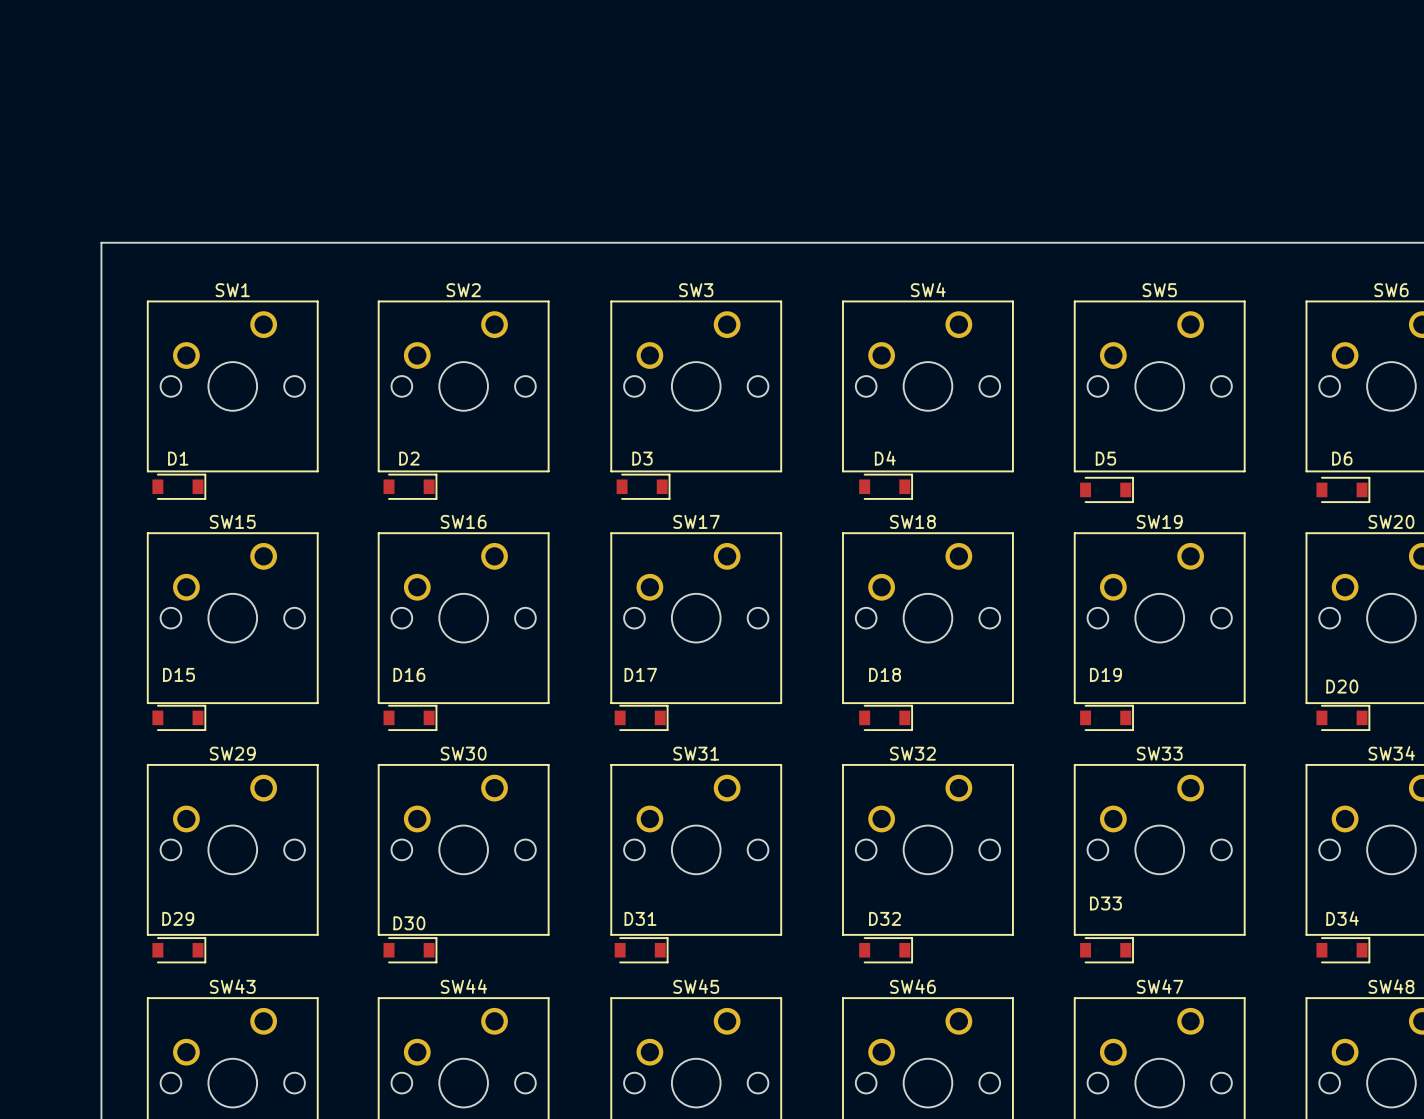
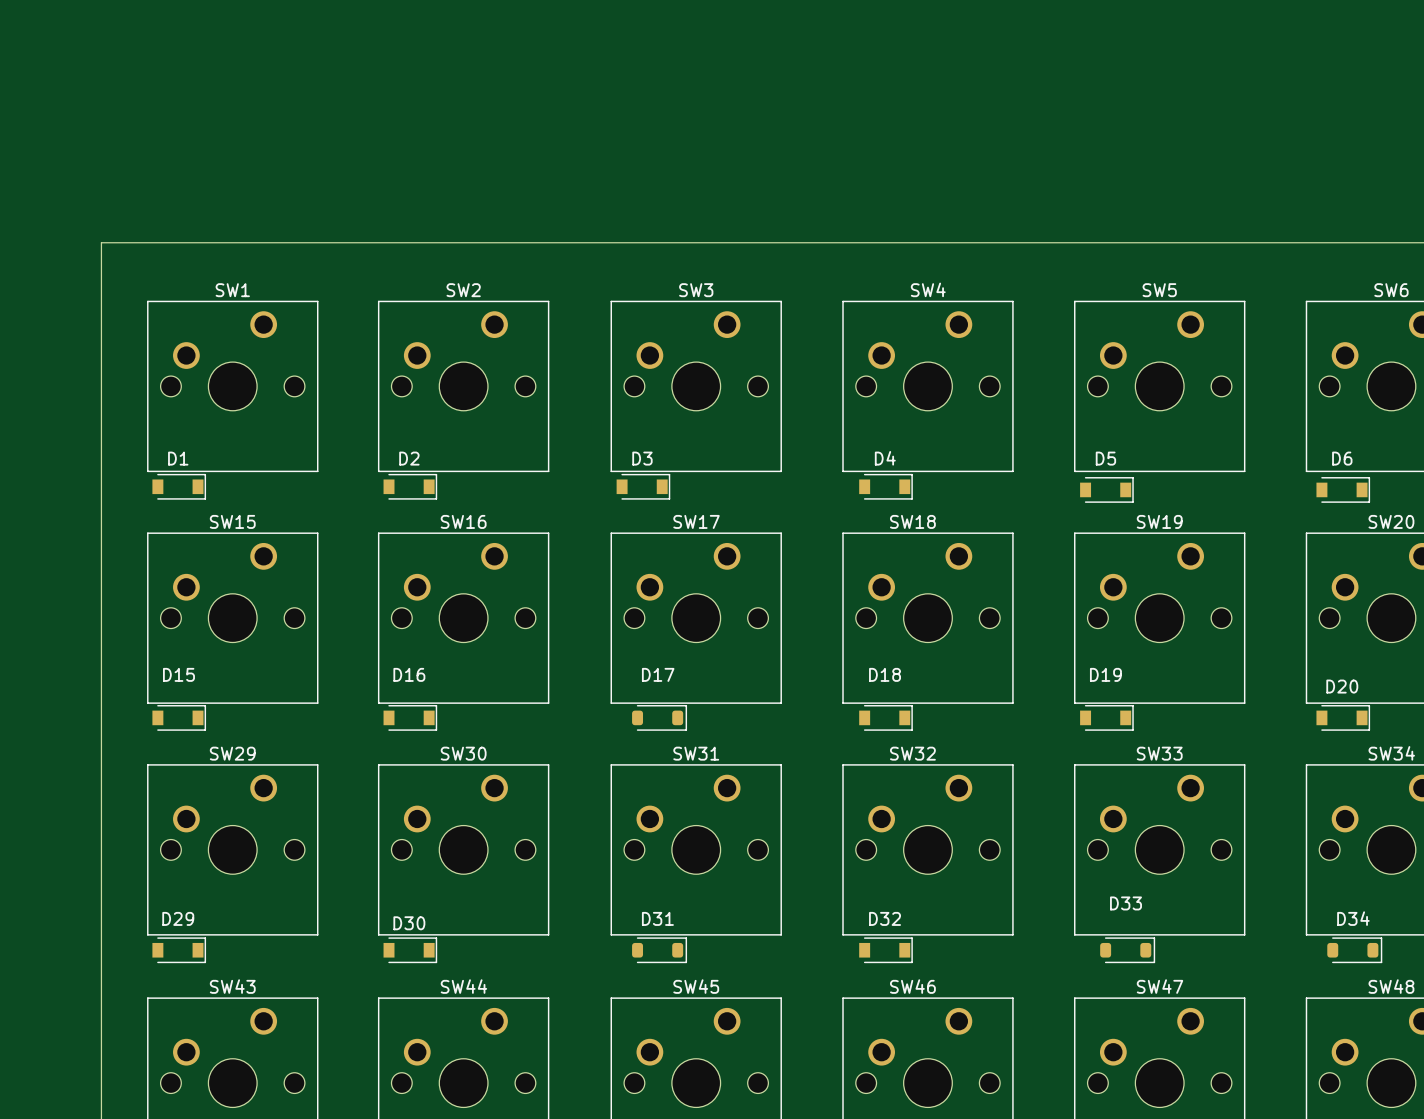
D17 footprint: [614, 705, 669, 731] -> [632, 705, 688, 731]
D31 footprint: [614, 937, 669, 964] -> [632, 937, 688, 964]
D33 footprint: [1080, 937, 1134, 964] -> [1100, 937, 1156, 964]
D34 footprint: [1316, 937, 1371, 964] -> [1327, 937, 1383, 964]

